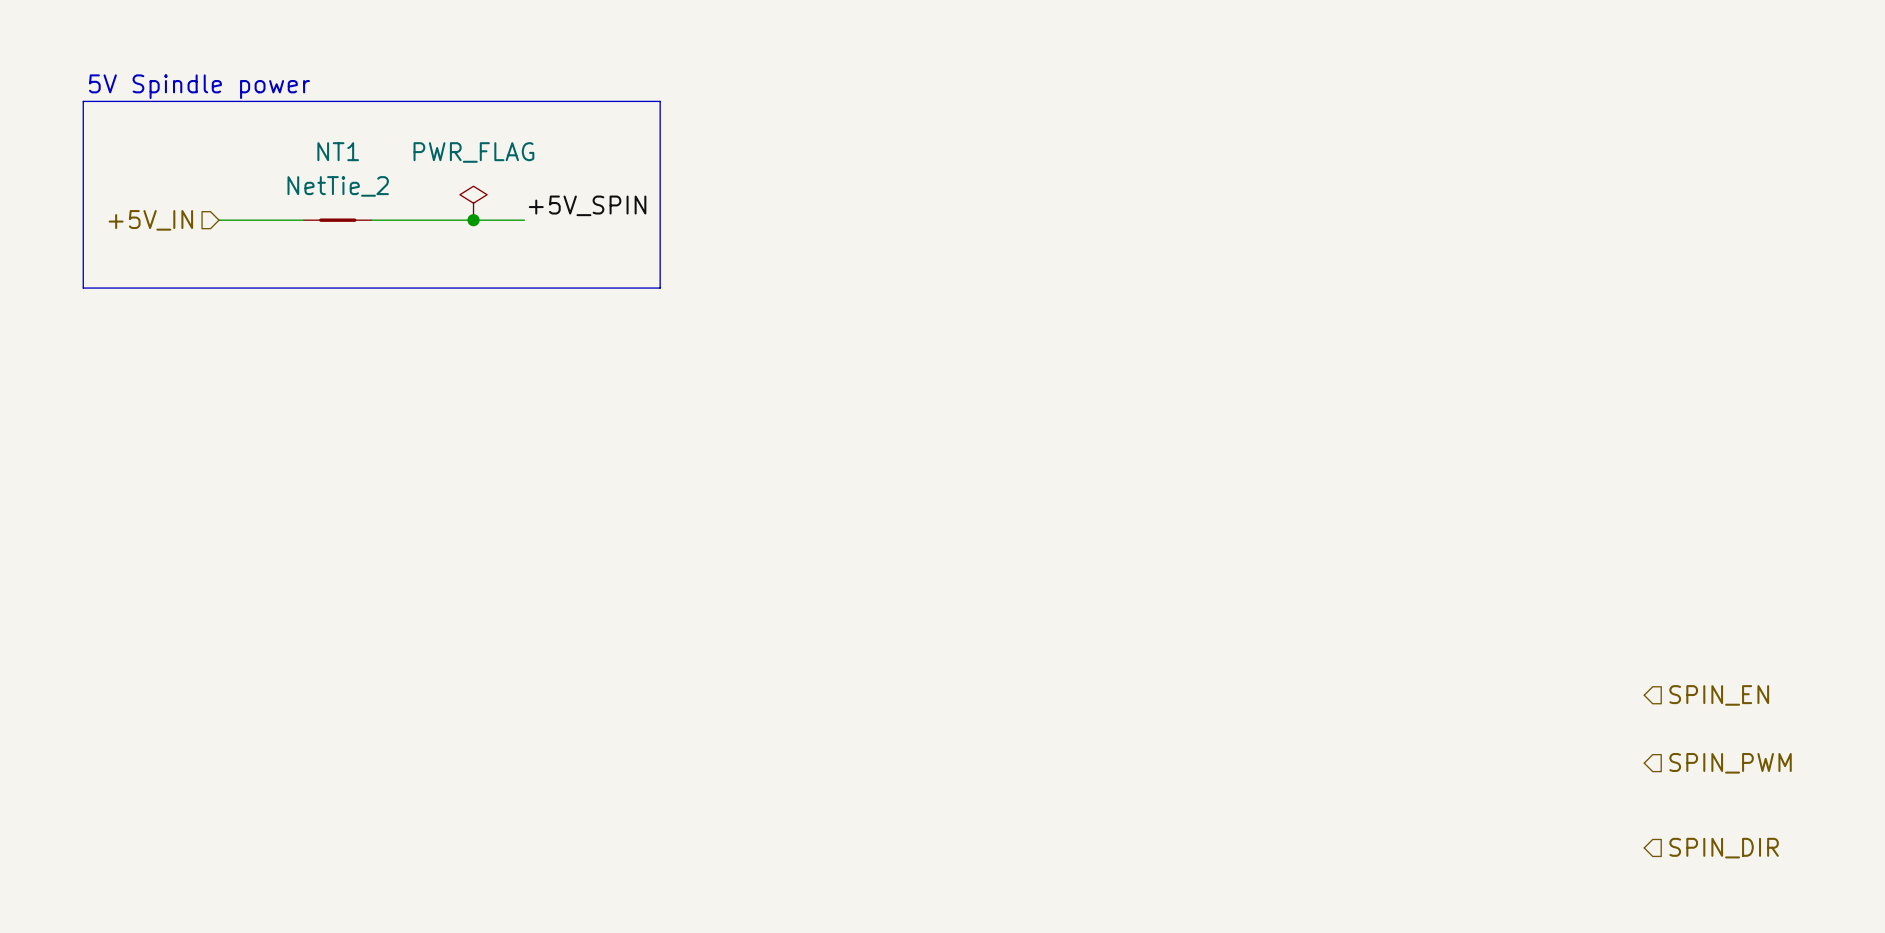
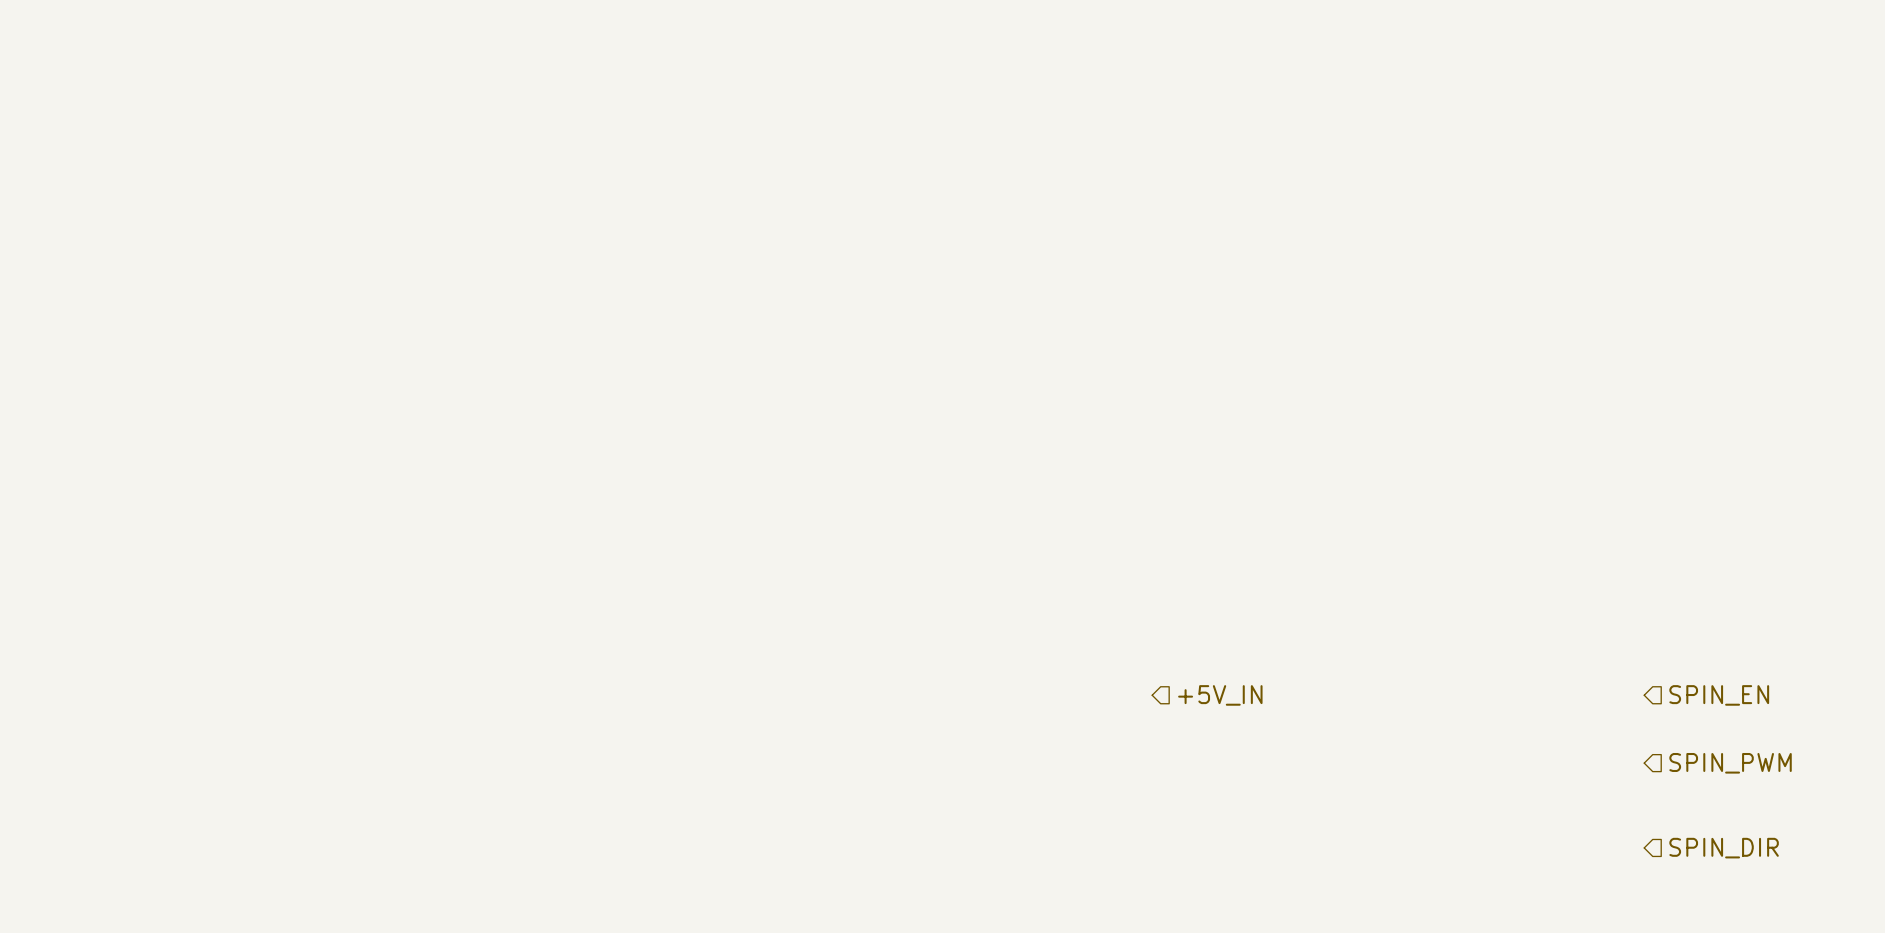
text: 5V Spindle power (199, 86) -> none
line: (83, 101) (660, 101) (660, 288) (83, 288) (83, 101) -> none
power symbol: PWR_FLAG (473, 203) -> none
label: +5V_SPIN (587, 205) -> none
hierarchical label: +5V_IN (150, 220) -> none
wire: (219, 220) (303, 220) -> none
NT1: NetTie_2 (337, 220) -> none
wire: (371, 220) (524, 220) -> none
junction: (473, 220) -> none
hierarchical label: none -> +5V_IN (1220, 695)

